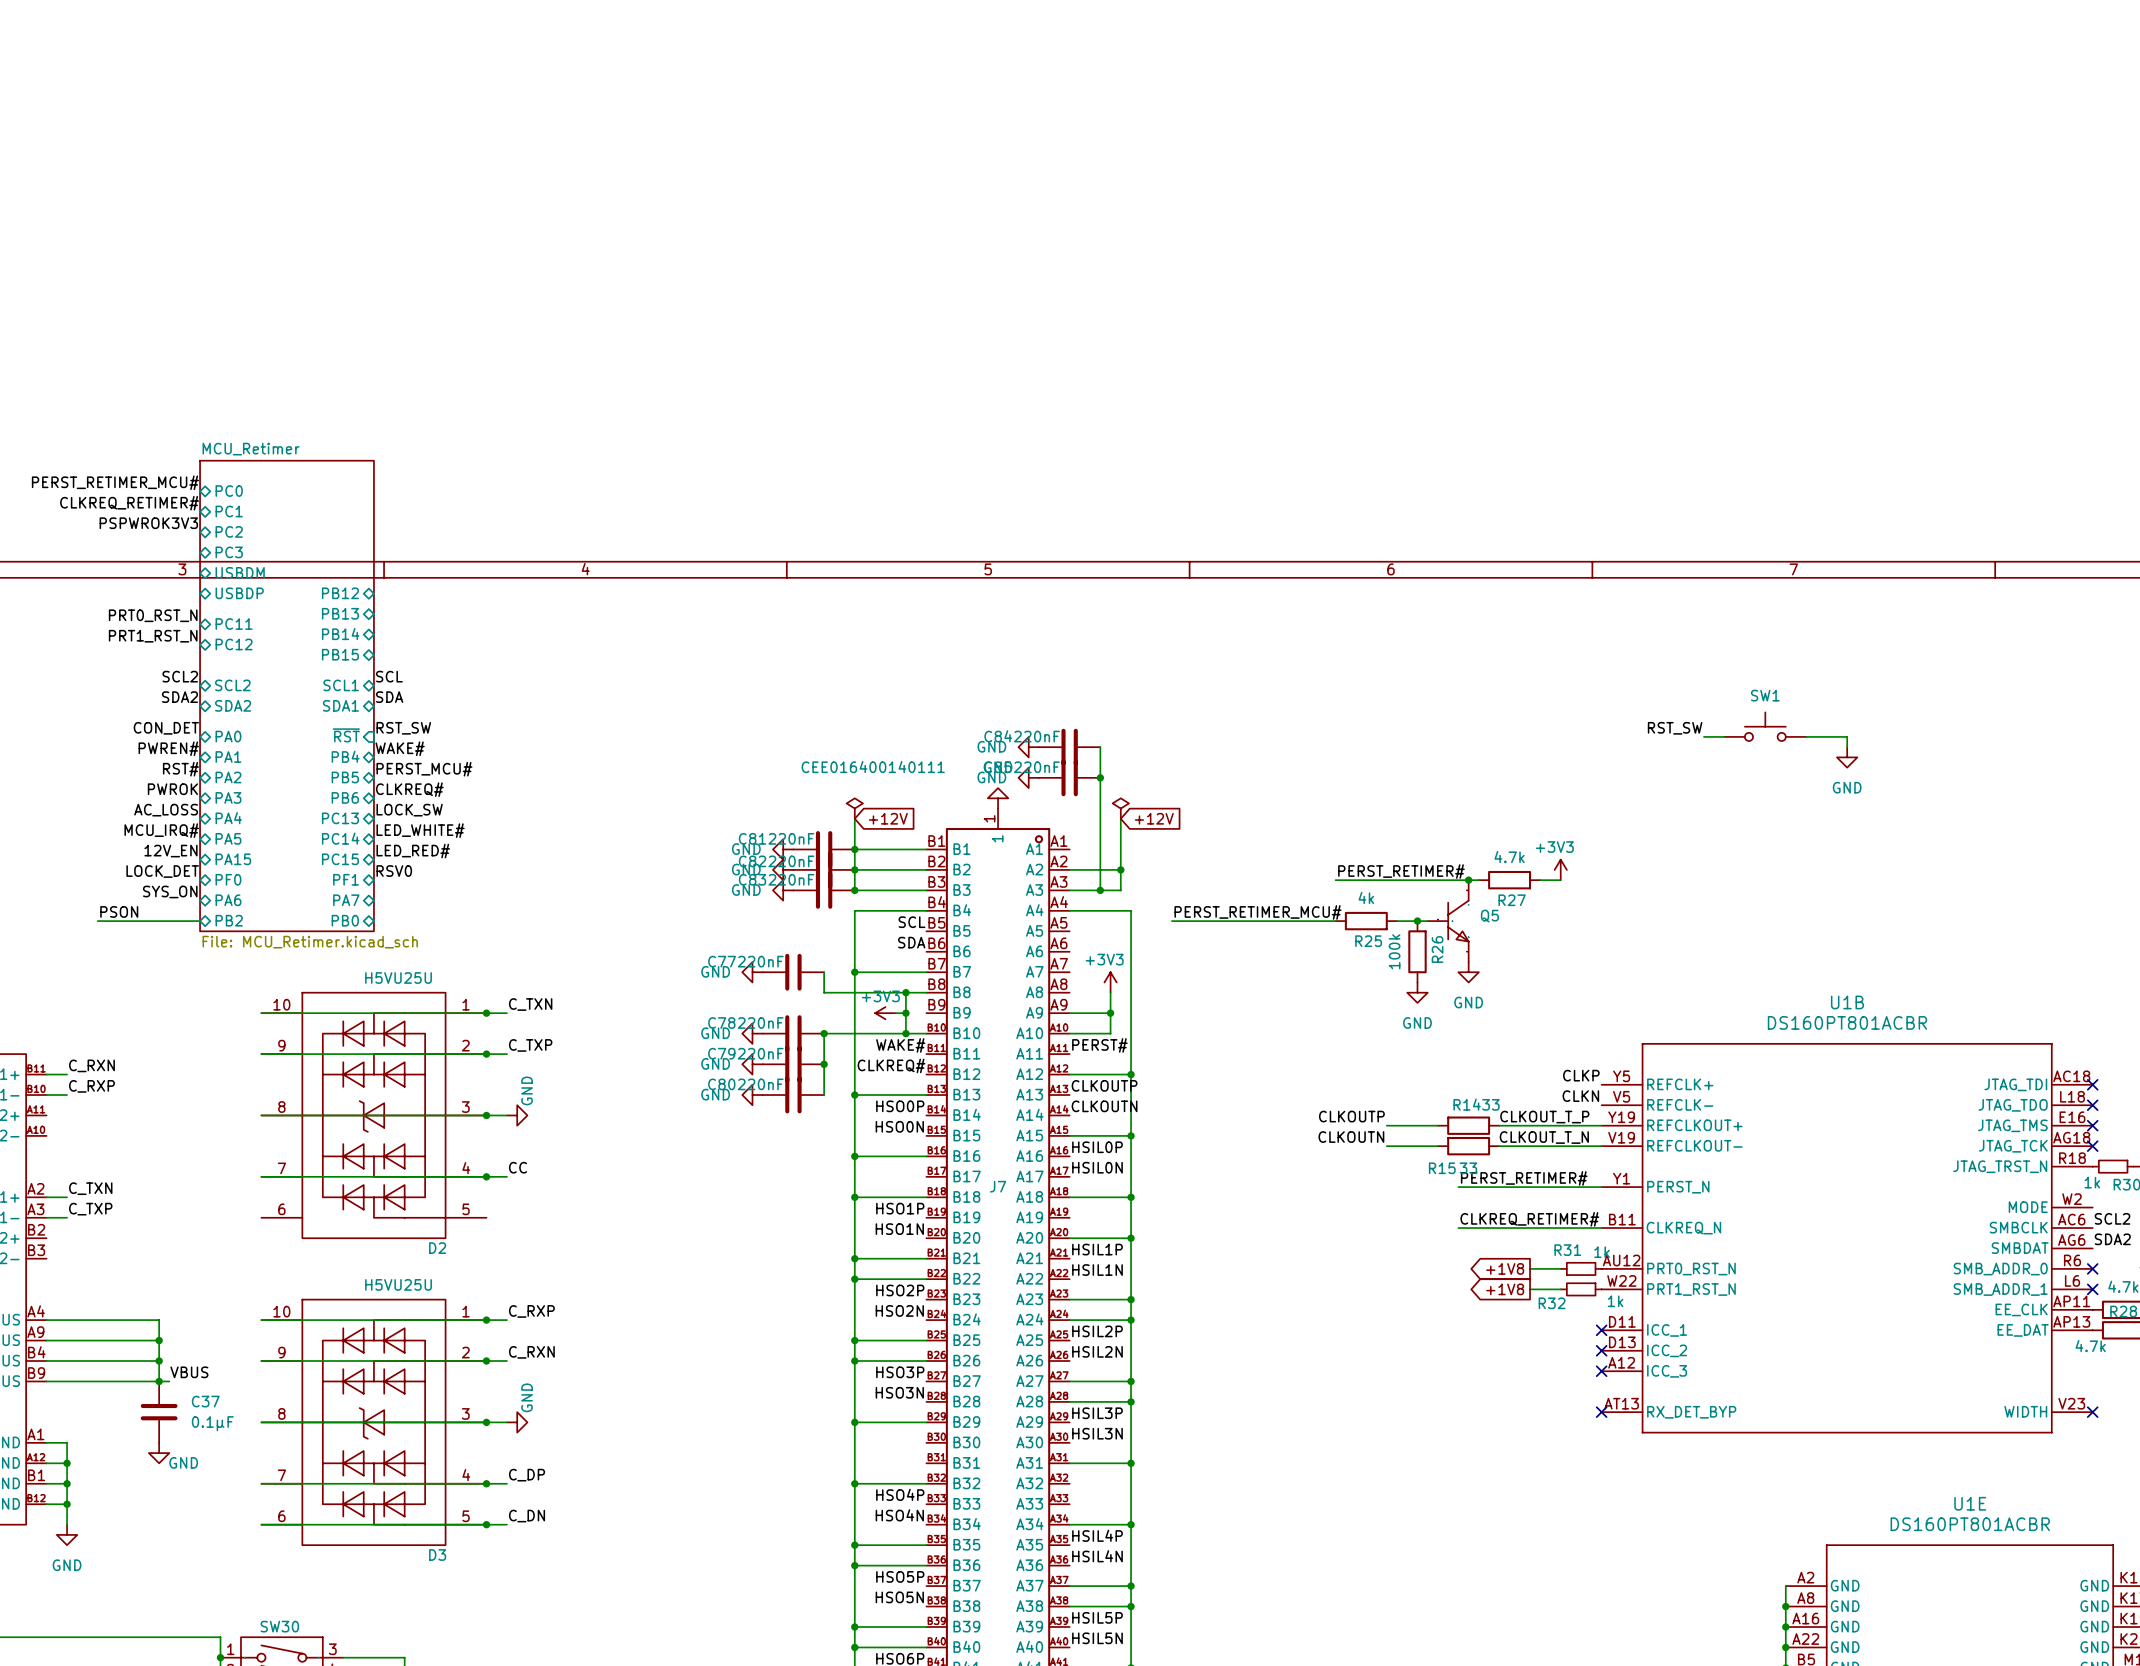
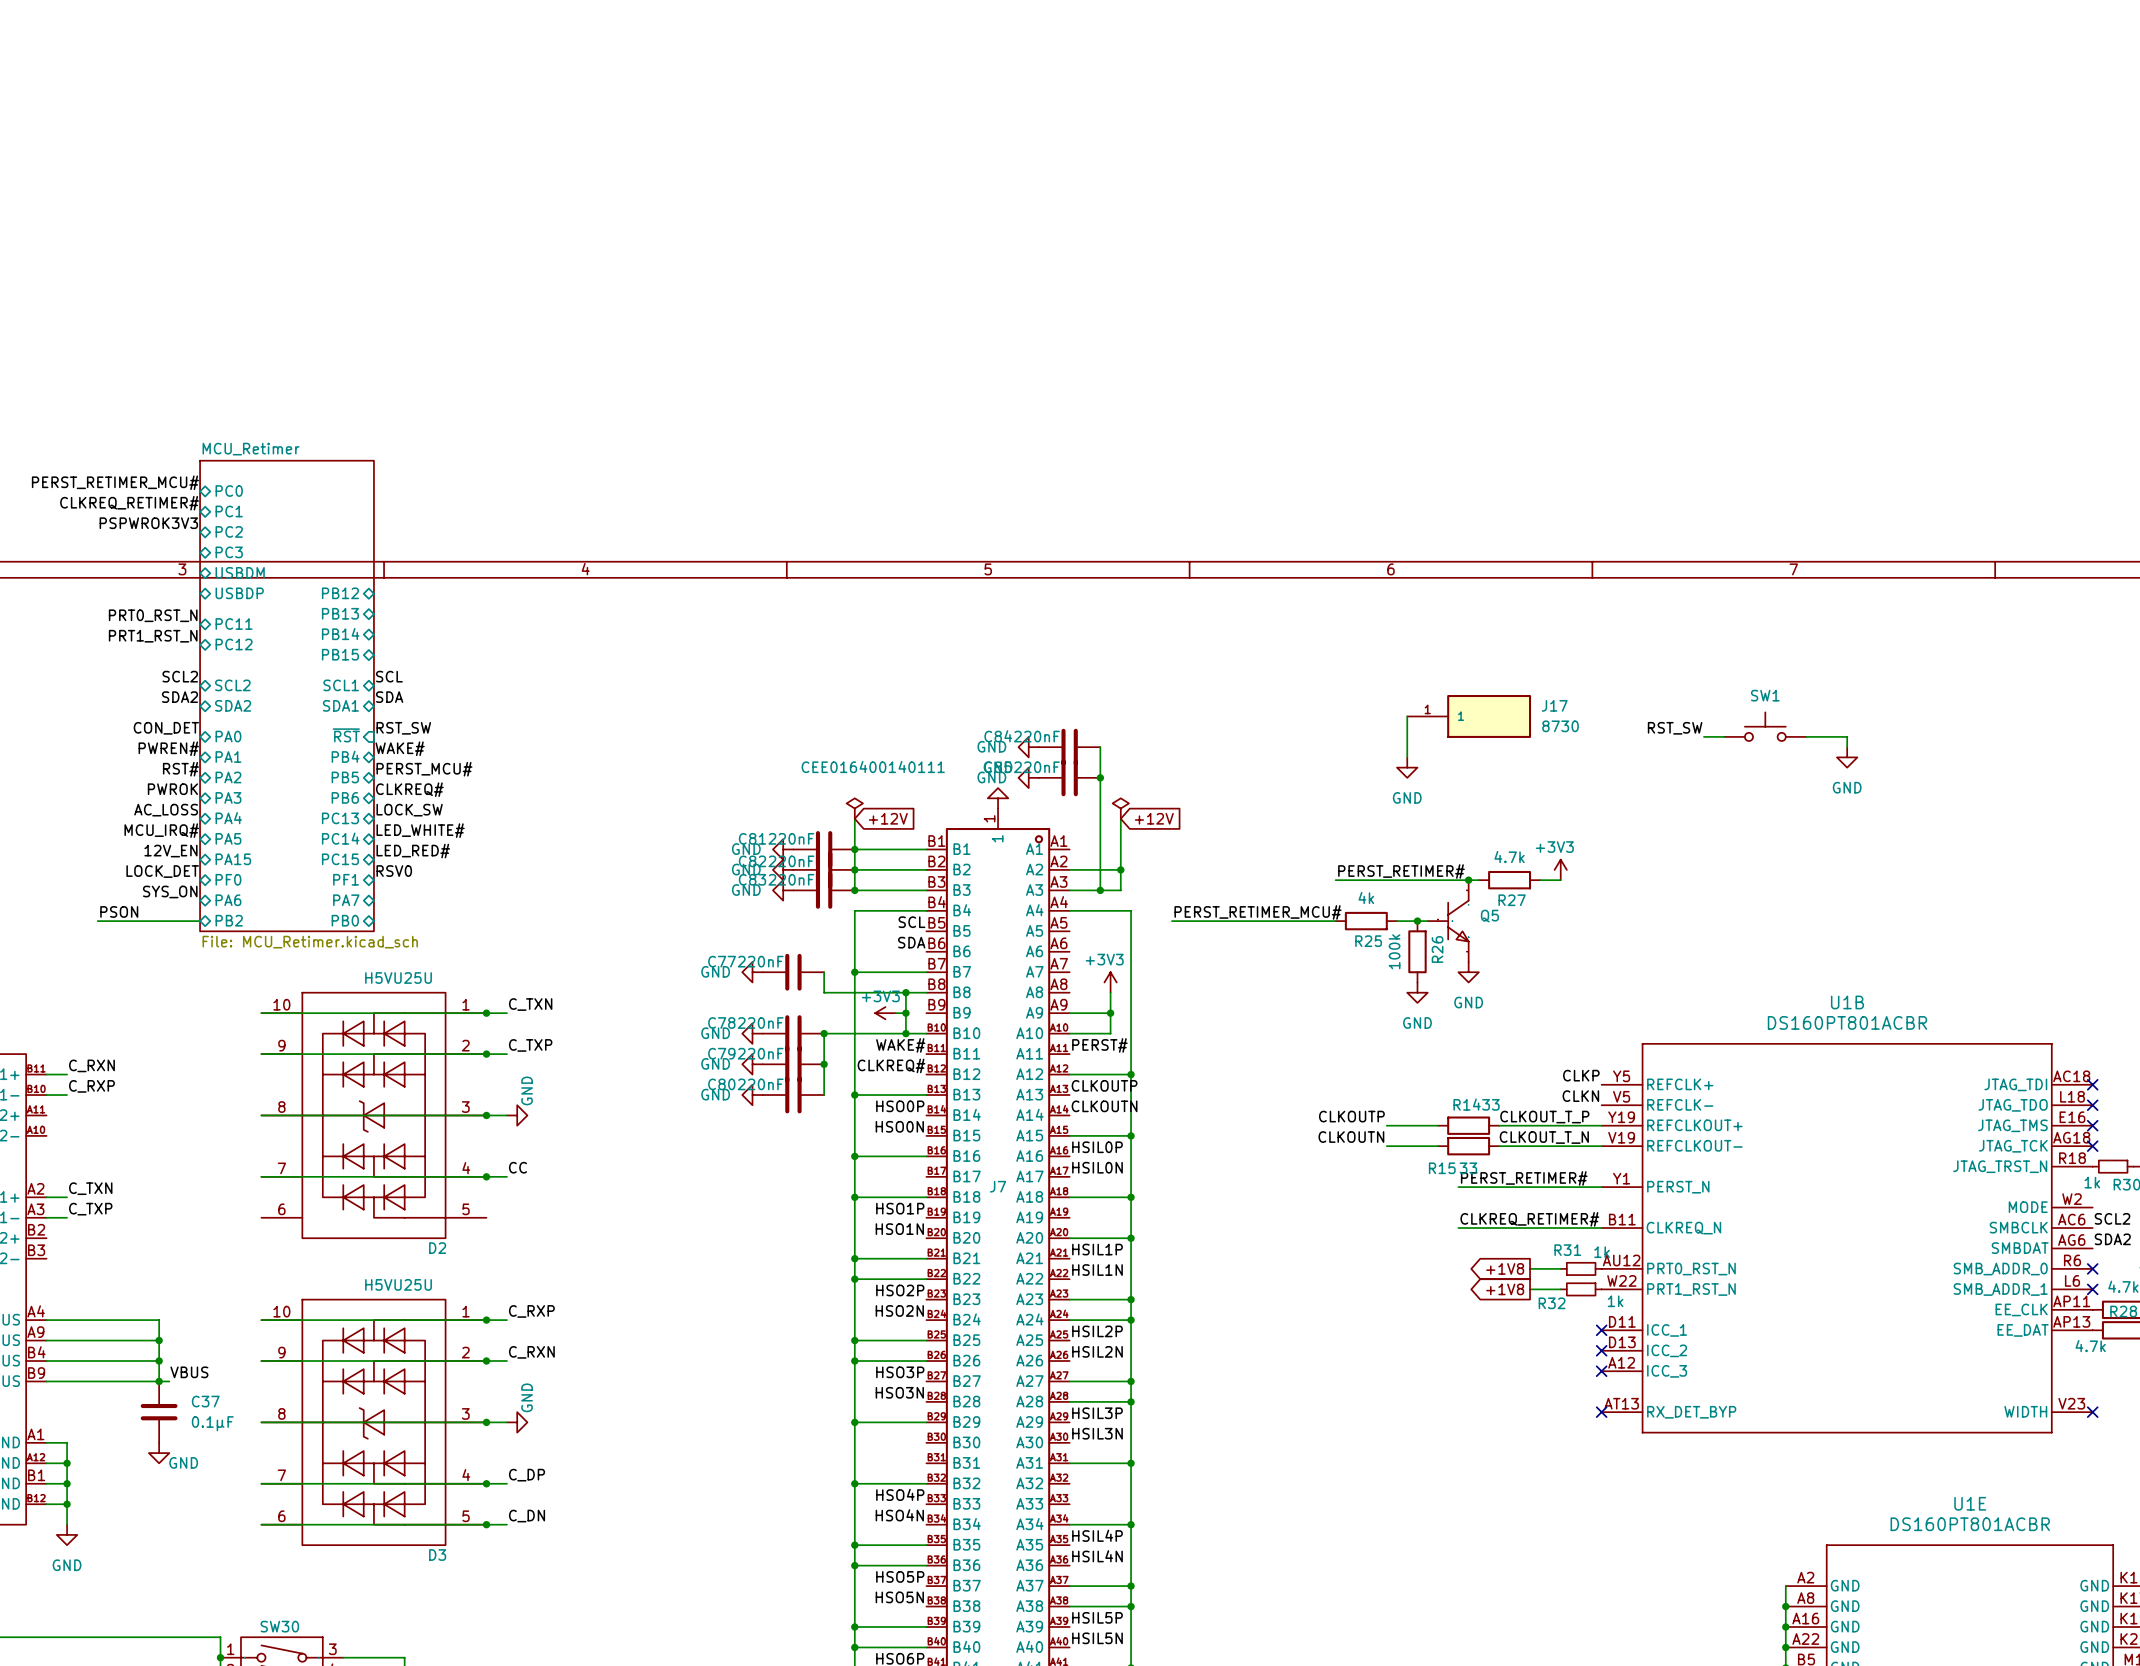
wire: none -> (1407, 716) (1407, 757)
J17: none -> 8730 (1469, 716)
power symbol: none -> GND (1407, 767)

